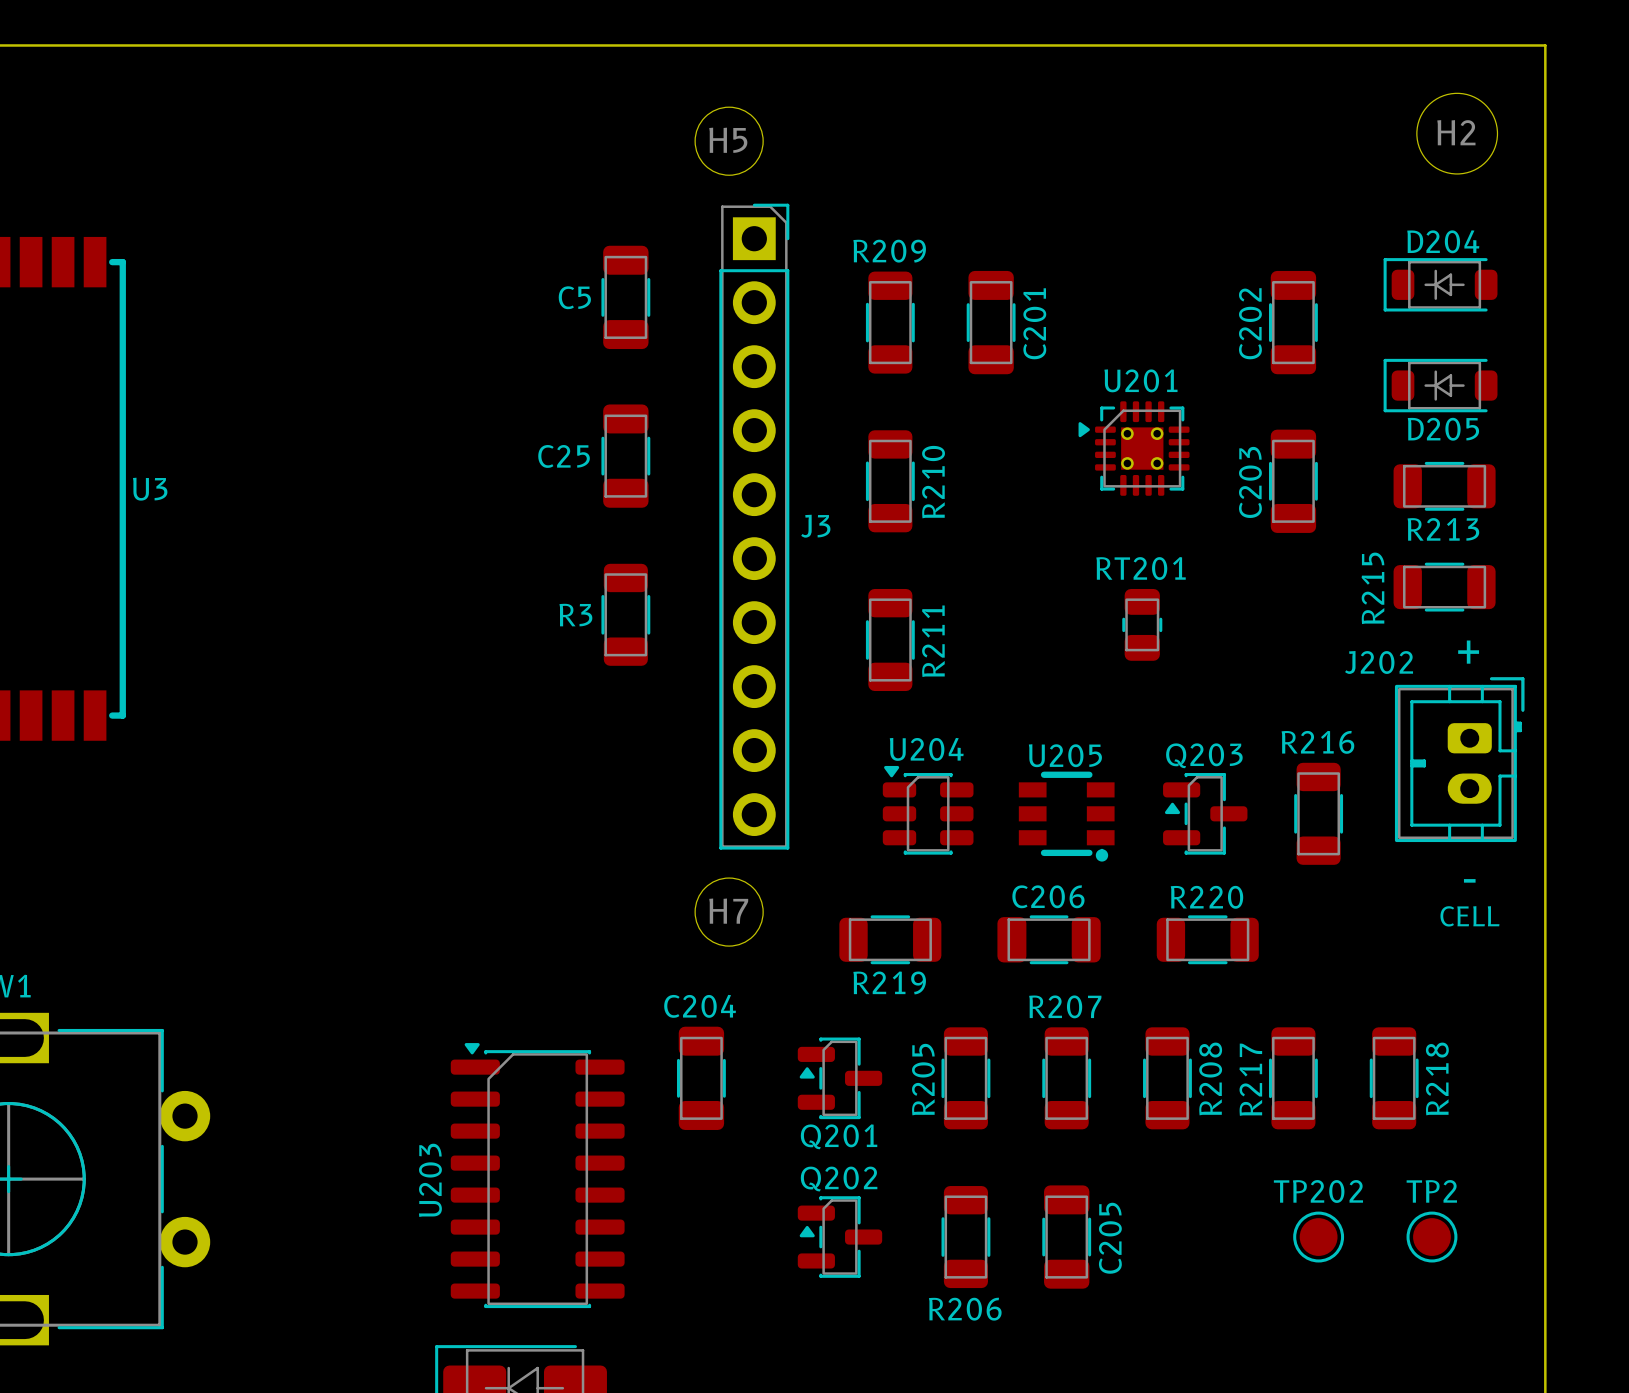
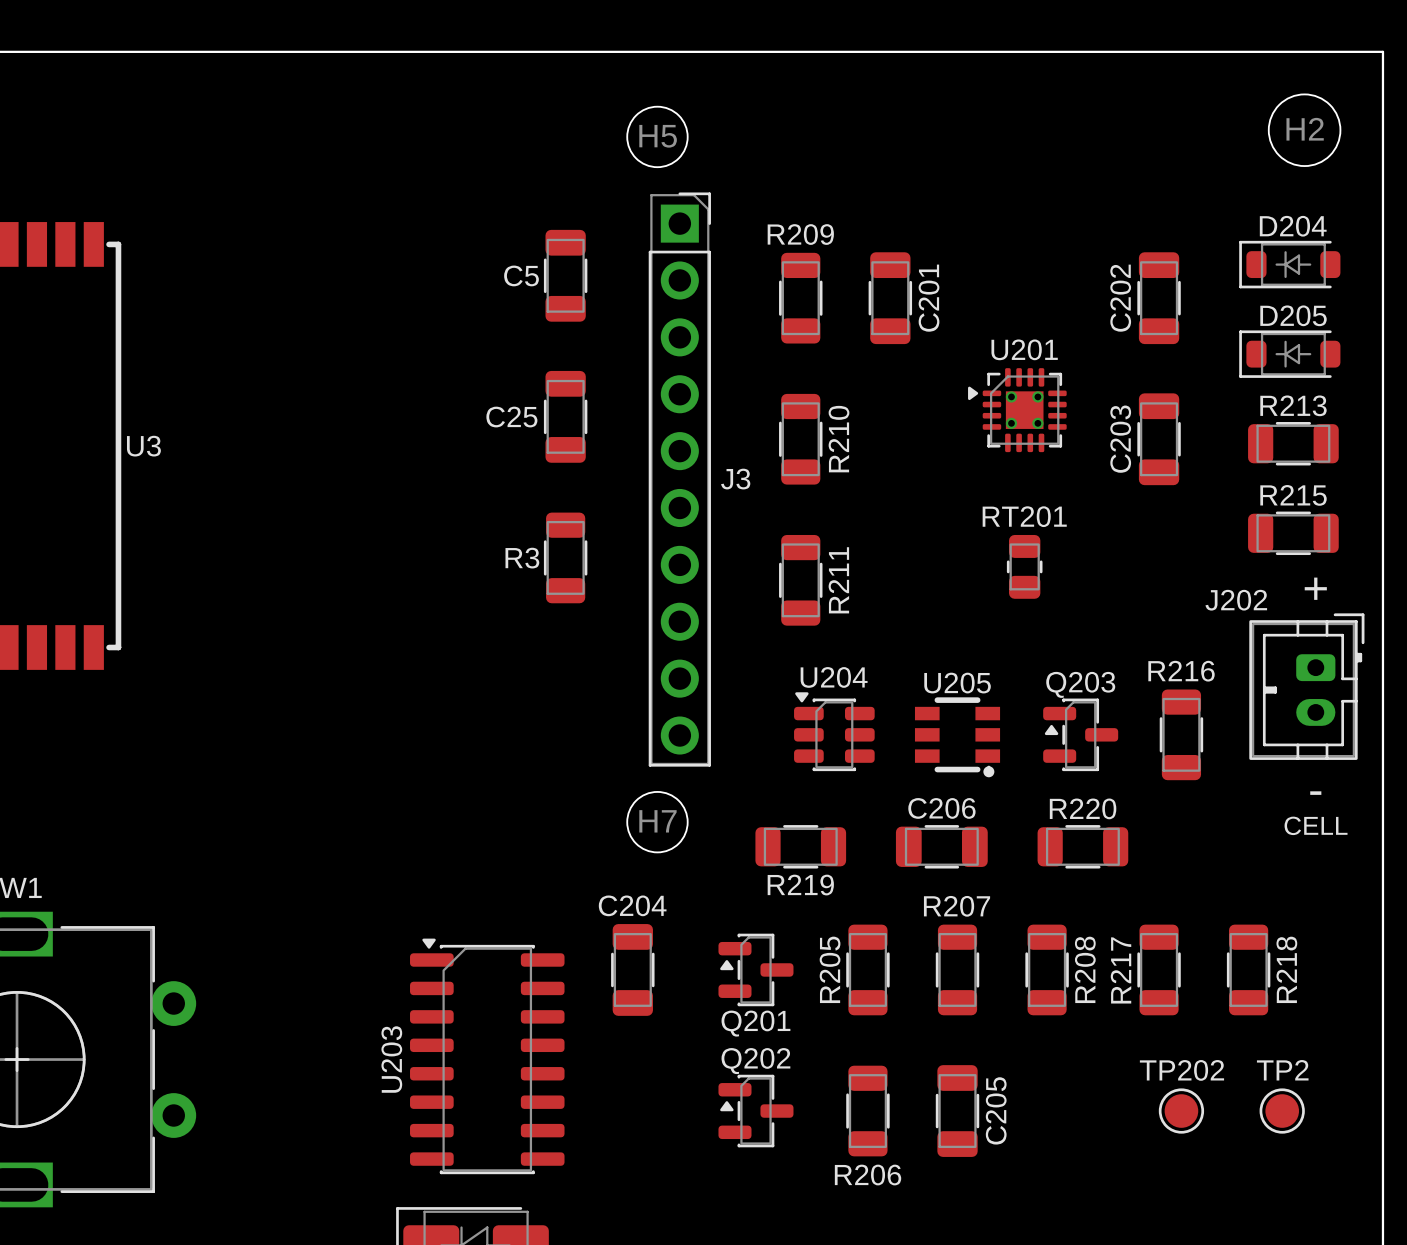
D205 name position: D205 (1443, 429) -> D205 (1293, 315)
R213 name position: R213 (1443, 529) -> R213 (1293, 405)
R215 name rotation: 0° (1372, 588) -> 90° clockwise (1293, 495)

